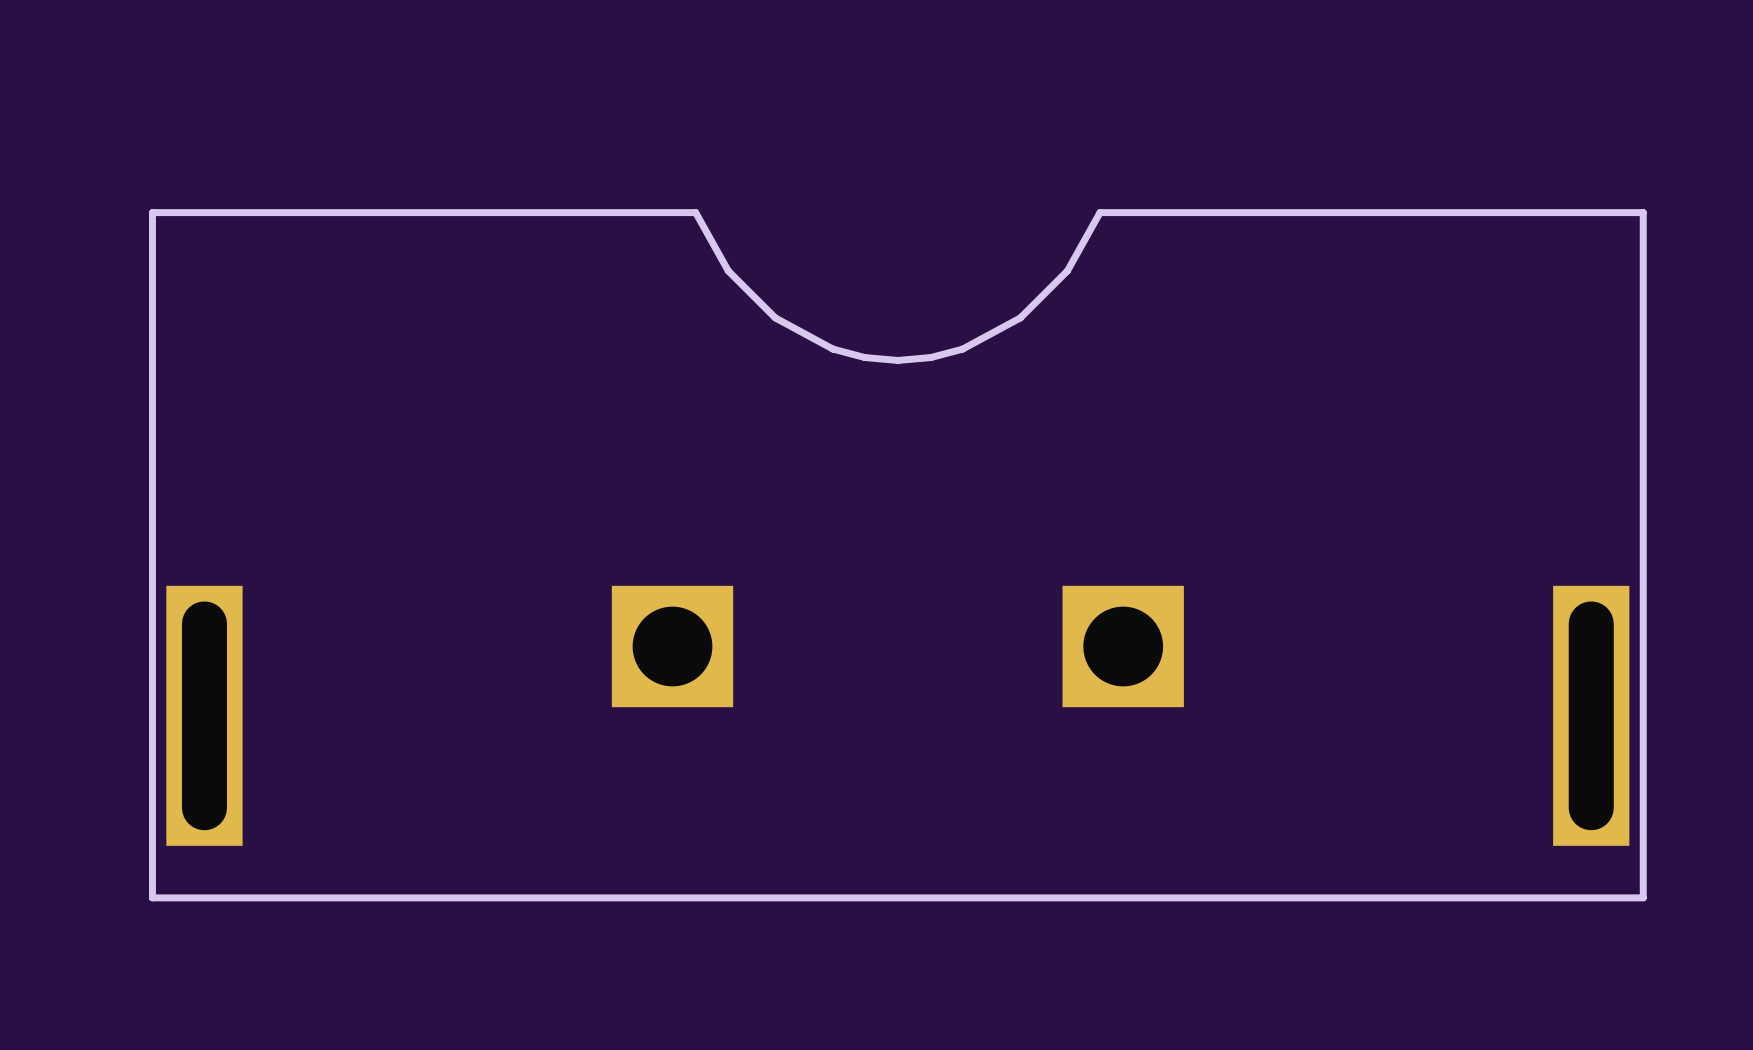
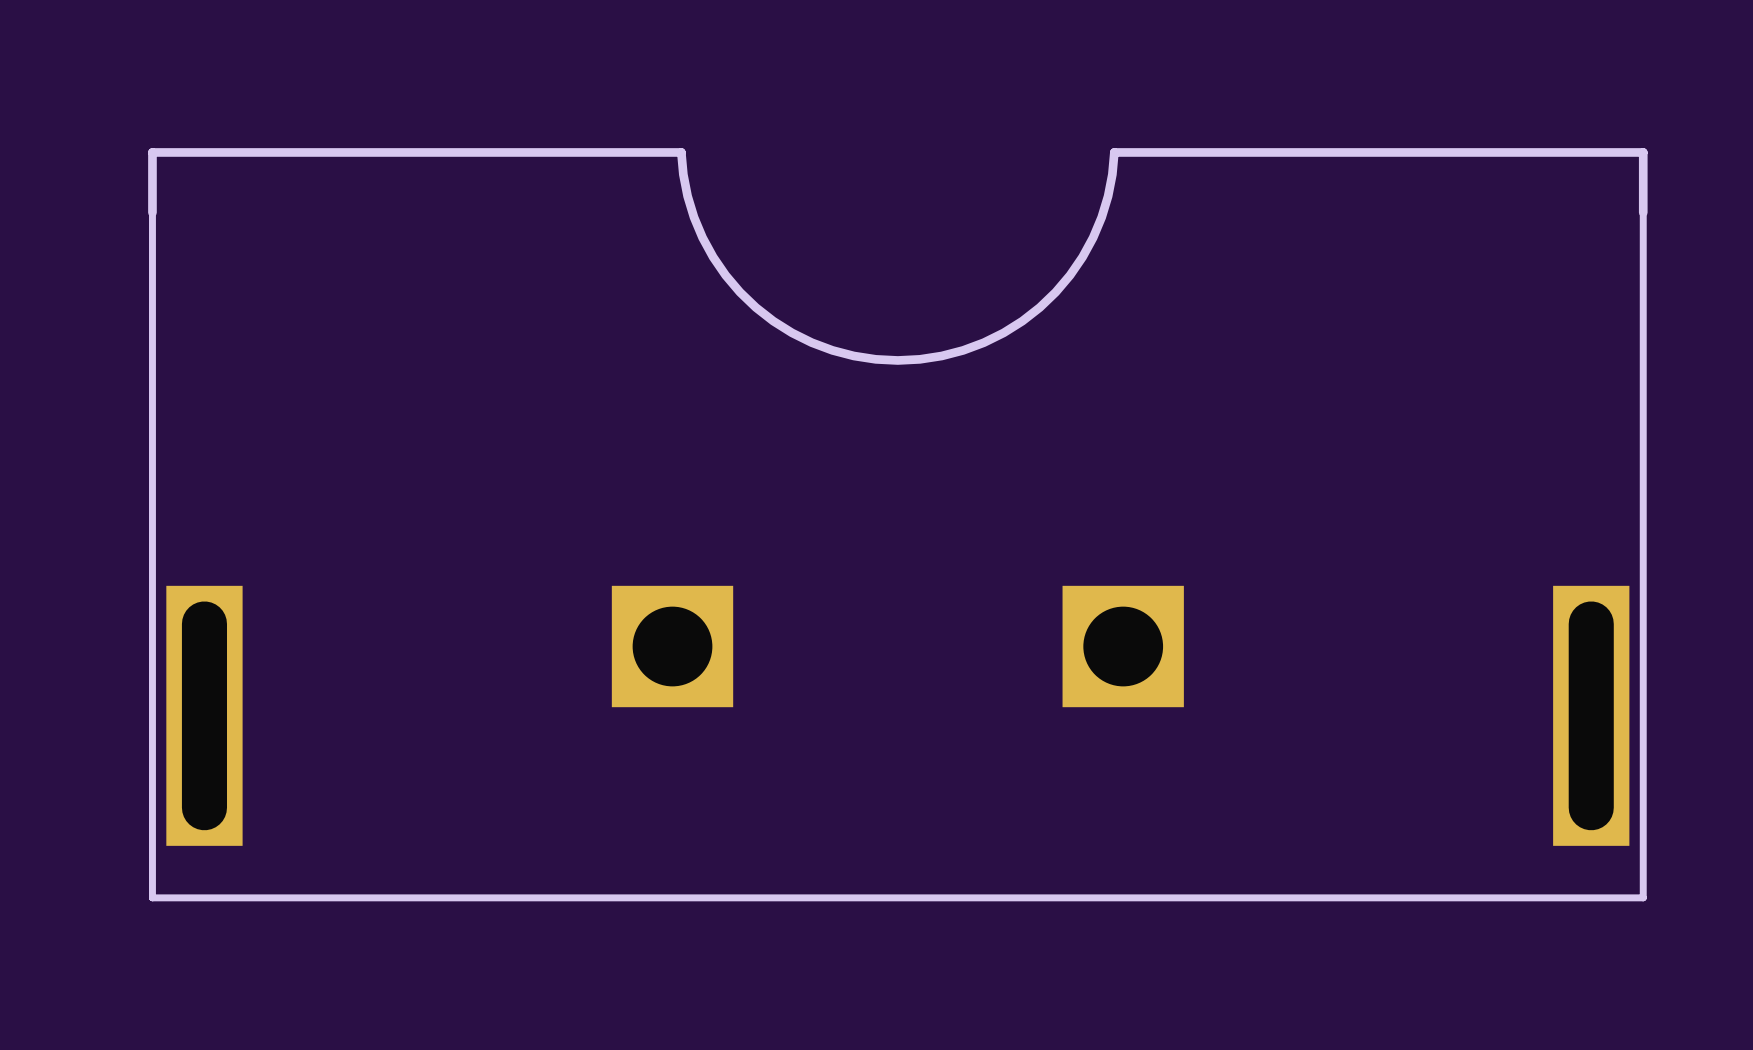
board edge: (1643, 212) (1100, 212) (1067, 270) (1020, 317) (962, 349) (930, 357) (897, 360) (864, 357) (833, 349) (775, 317) (728, 270) (695, 212) (152, 212) -> (1643, 212) (1643, 152) (1114, 152) (1112, 174) (1101, 217) (1082, 257) (1055, 292) (1022, 321) (983, 342) (941, 355) (897, 360) (853, 355) (811, 342) (773, 321) (739, 292) (725, 275) (702, 237) (687, 196) (681, 152) (152, 152) (152, 212)

